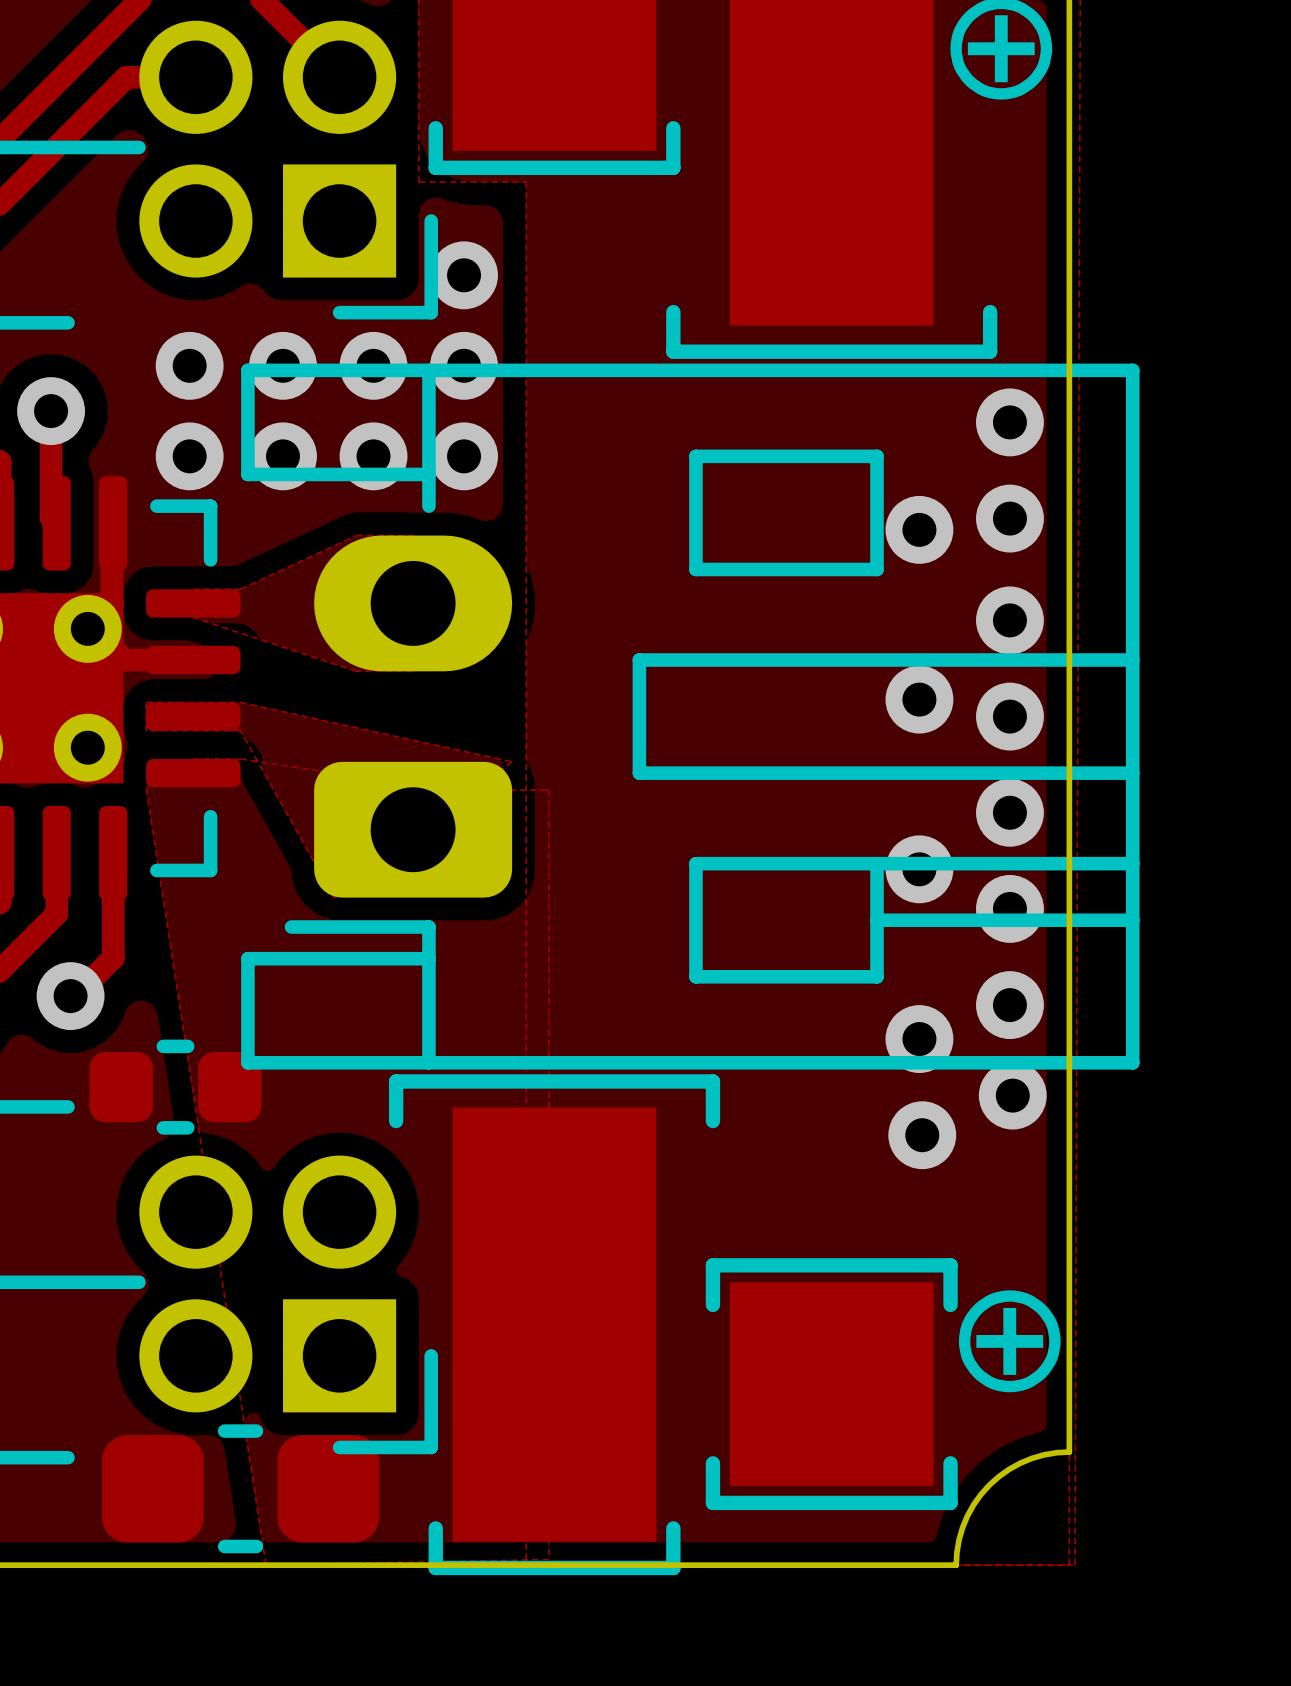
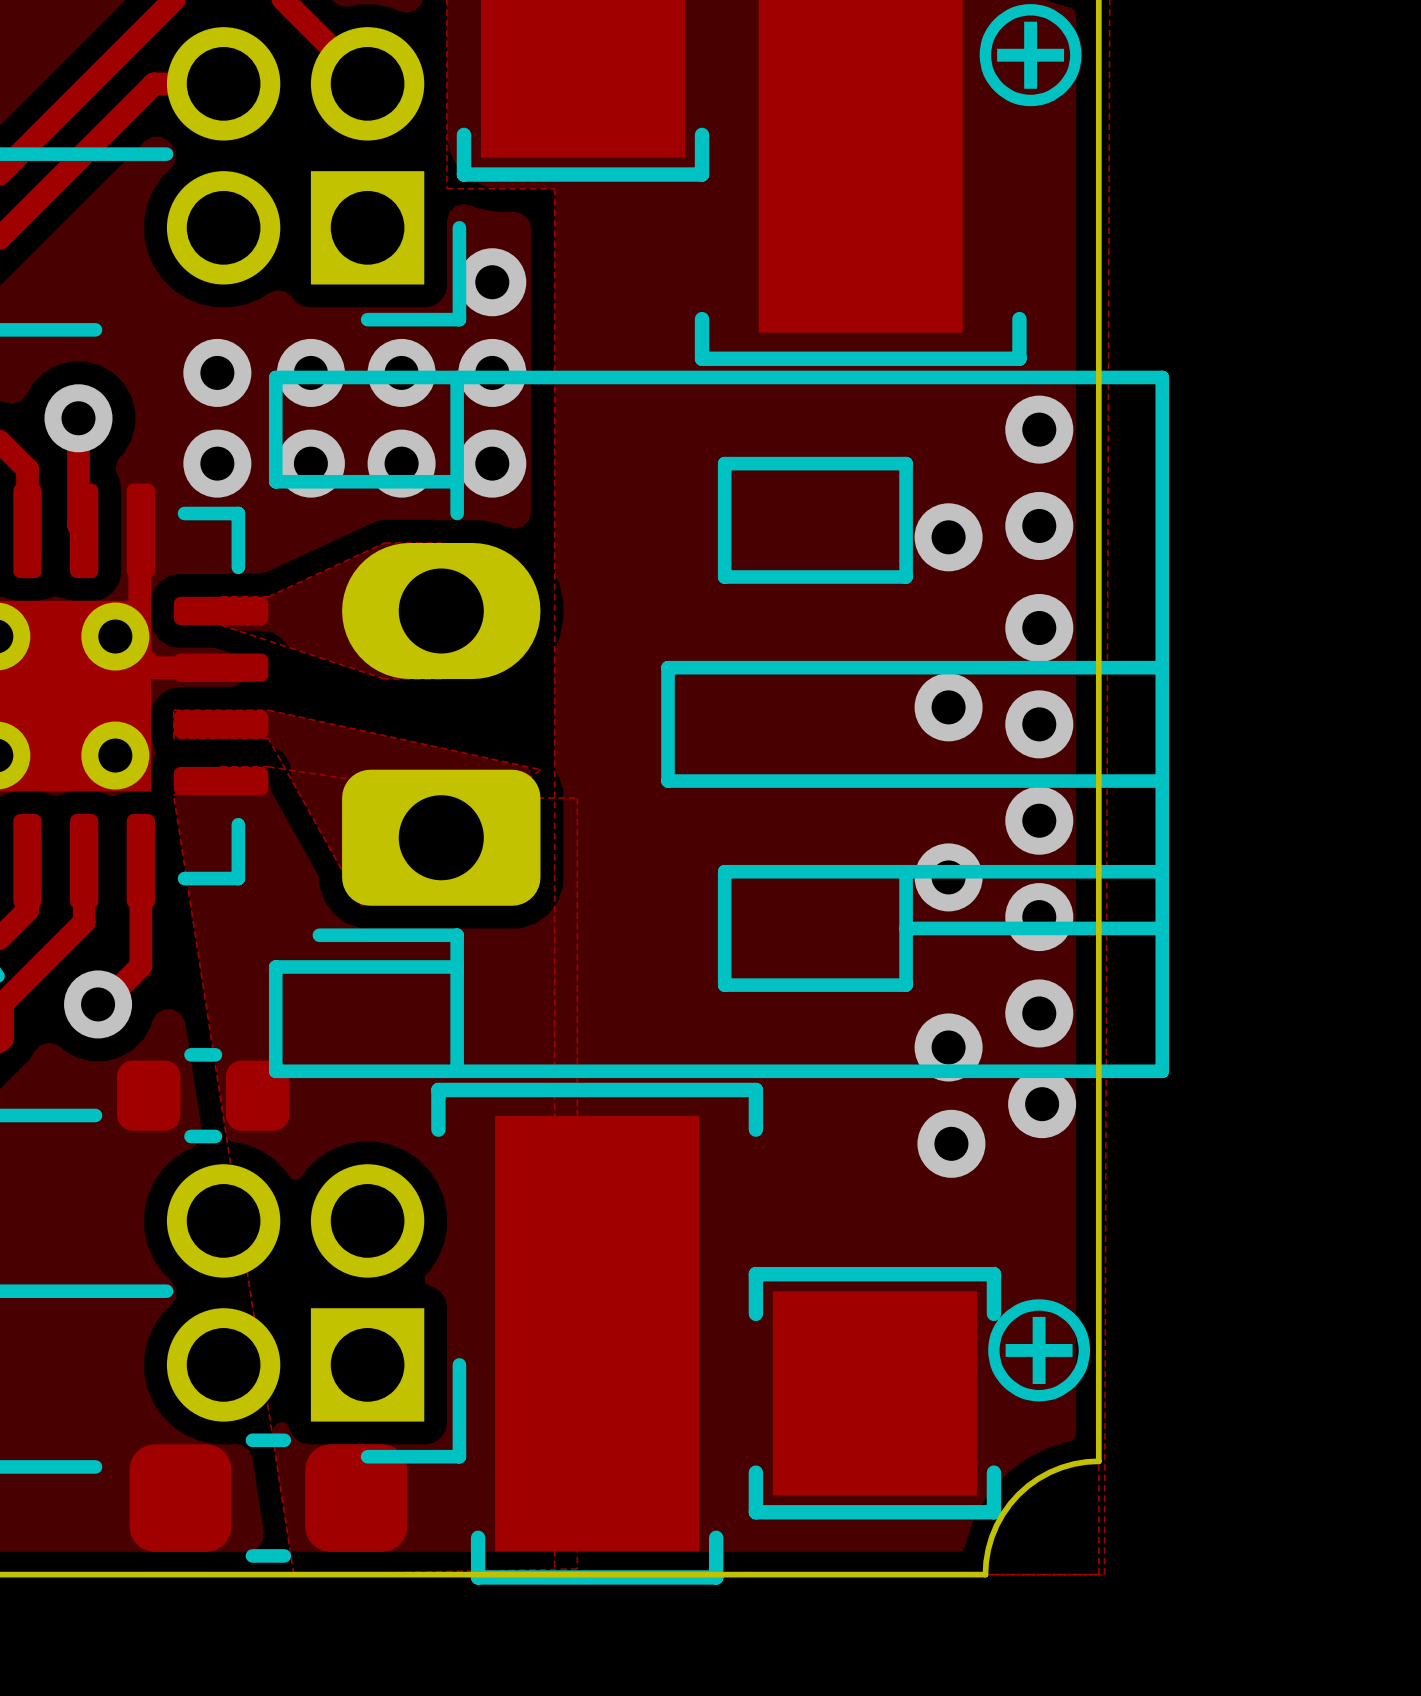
part position: (554, 1324) -> (597, 1333)
part position: (831, 1384) -> (874, 1393)

